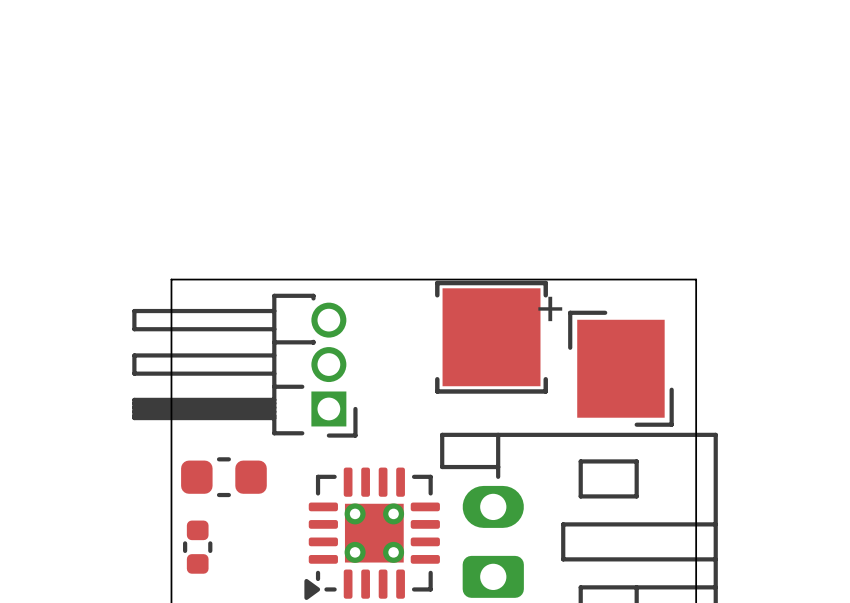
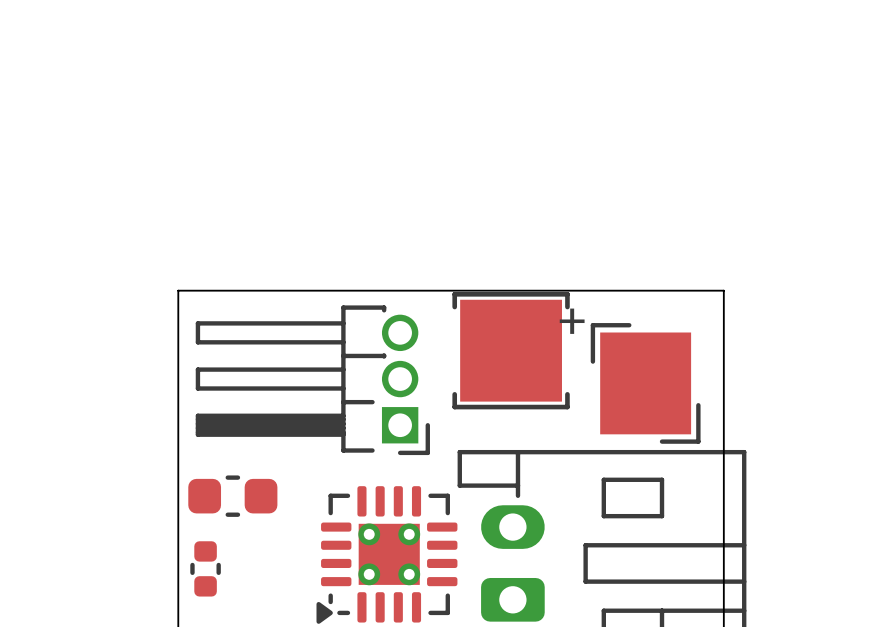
part position: (244, 365) -> (312, 380)

